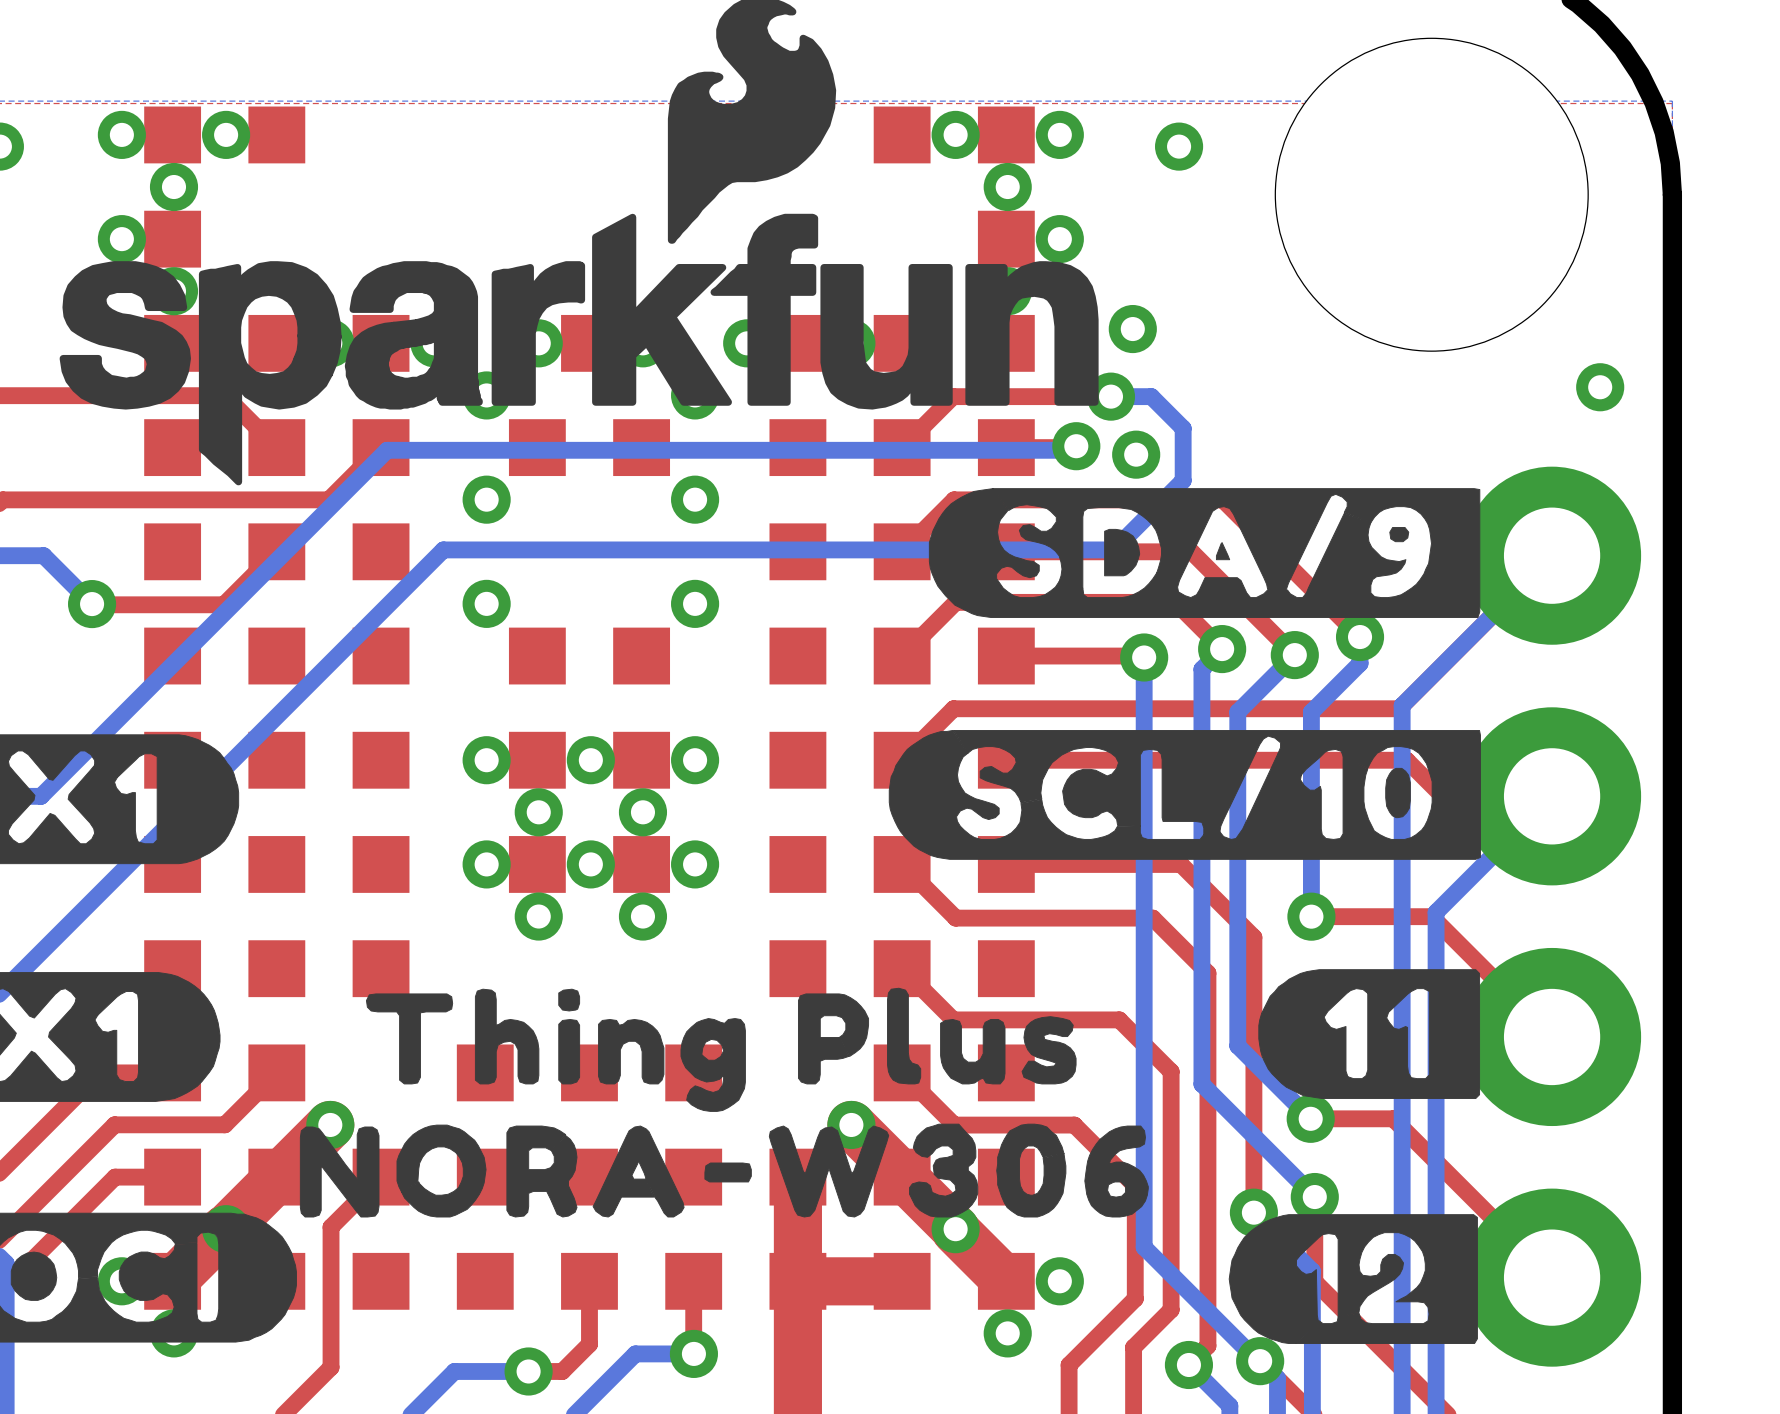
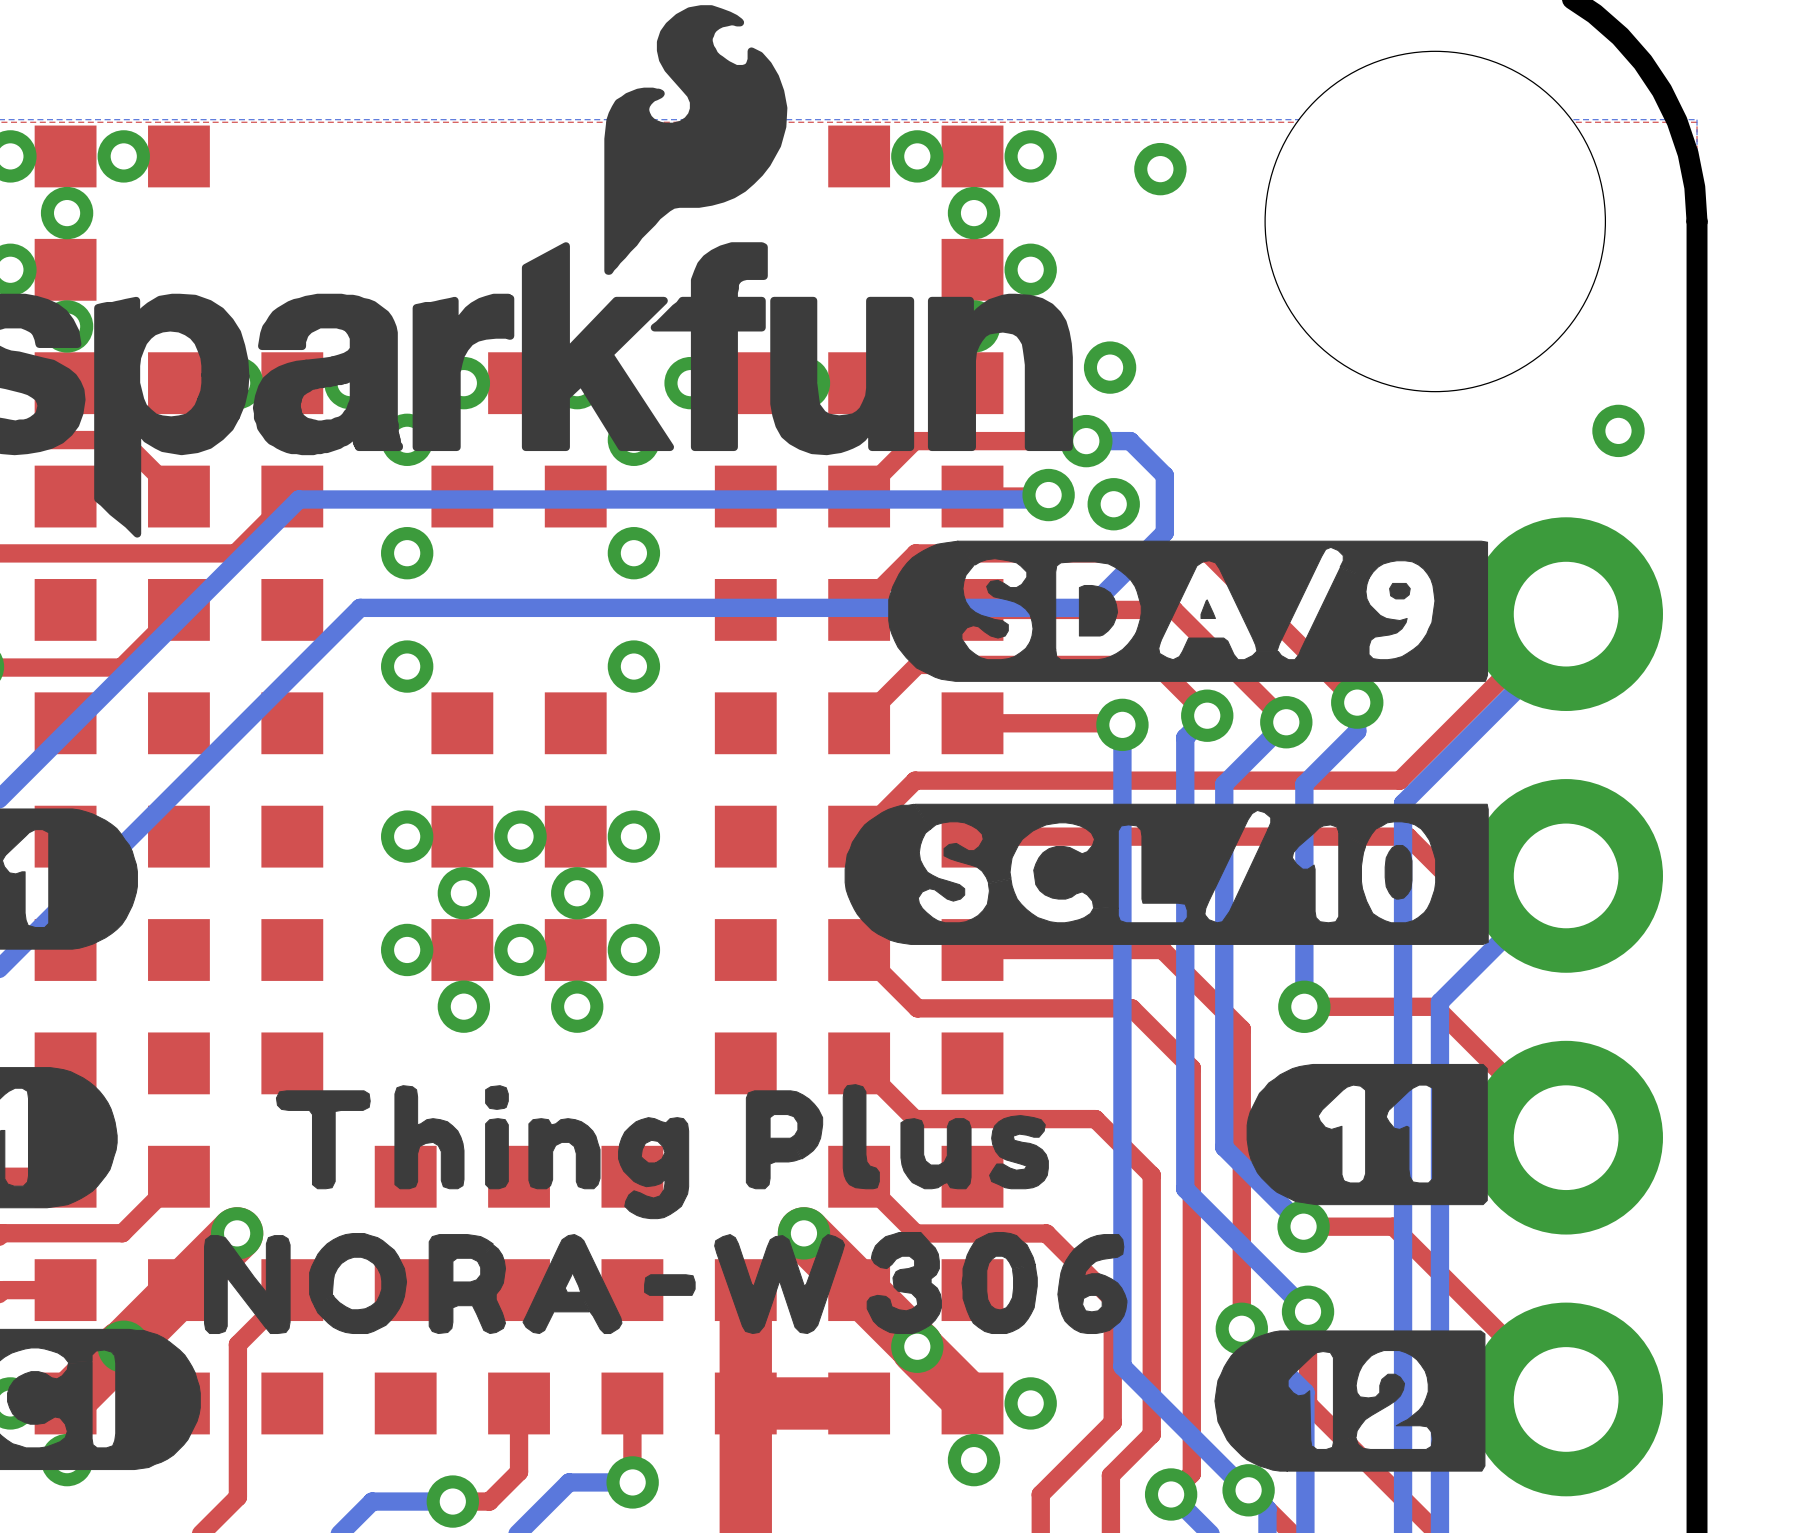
bottom track: (1552, 555) (1402, 705) (1402, 729) -> (1566, 614) (1566, 640) (1403, 803)

